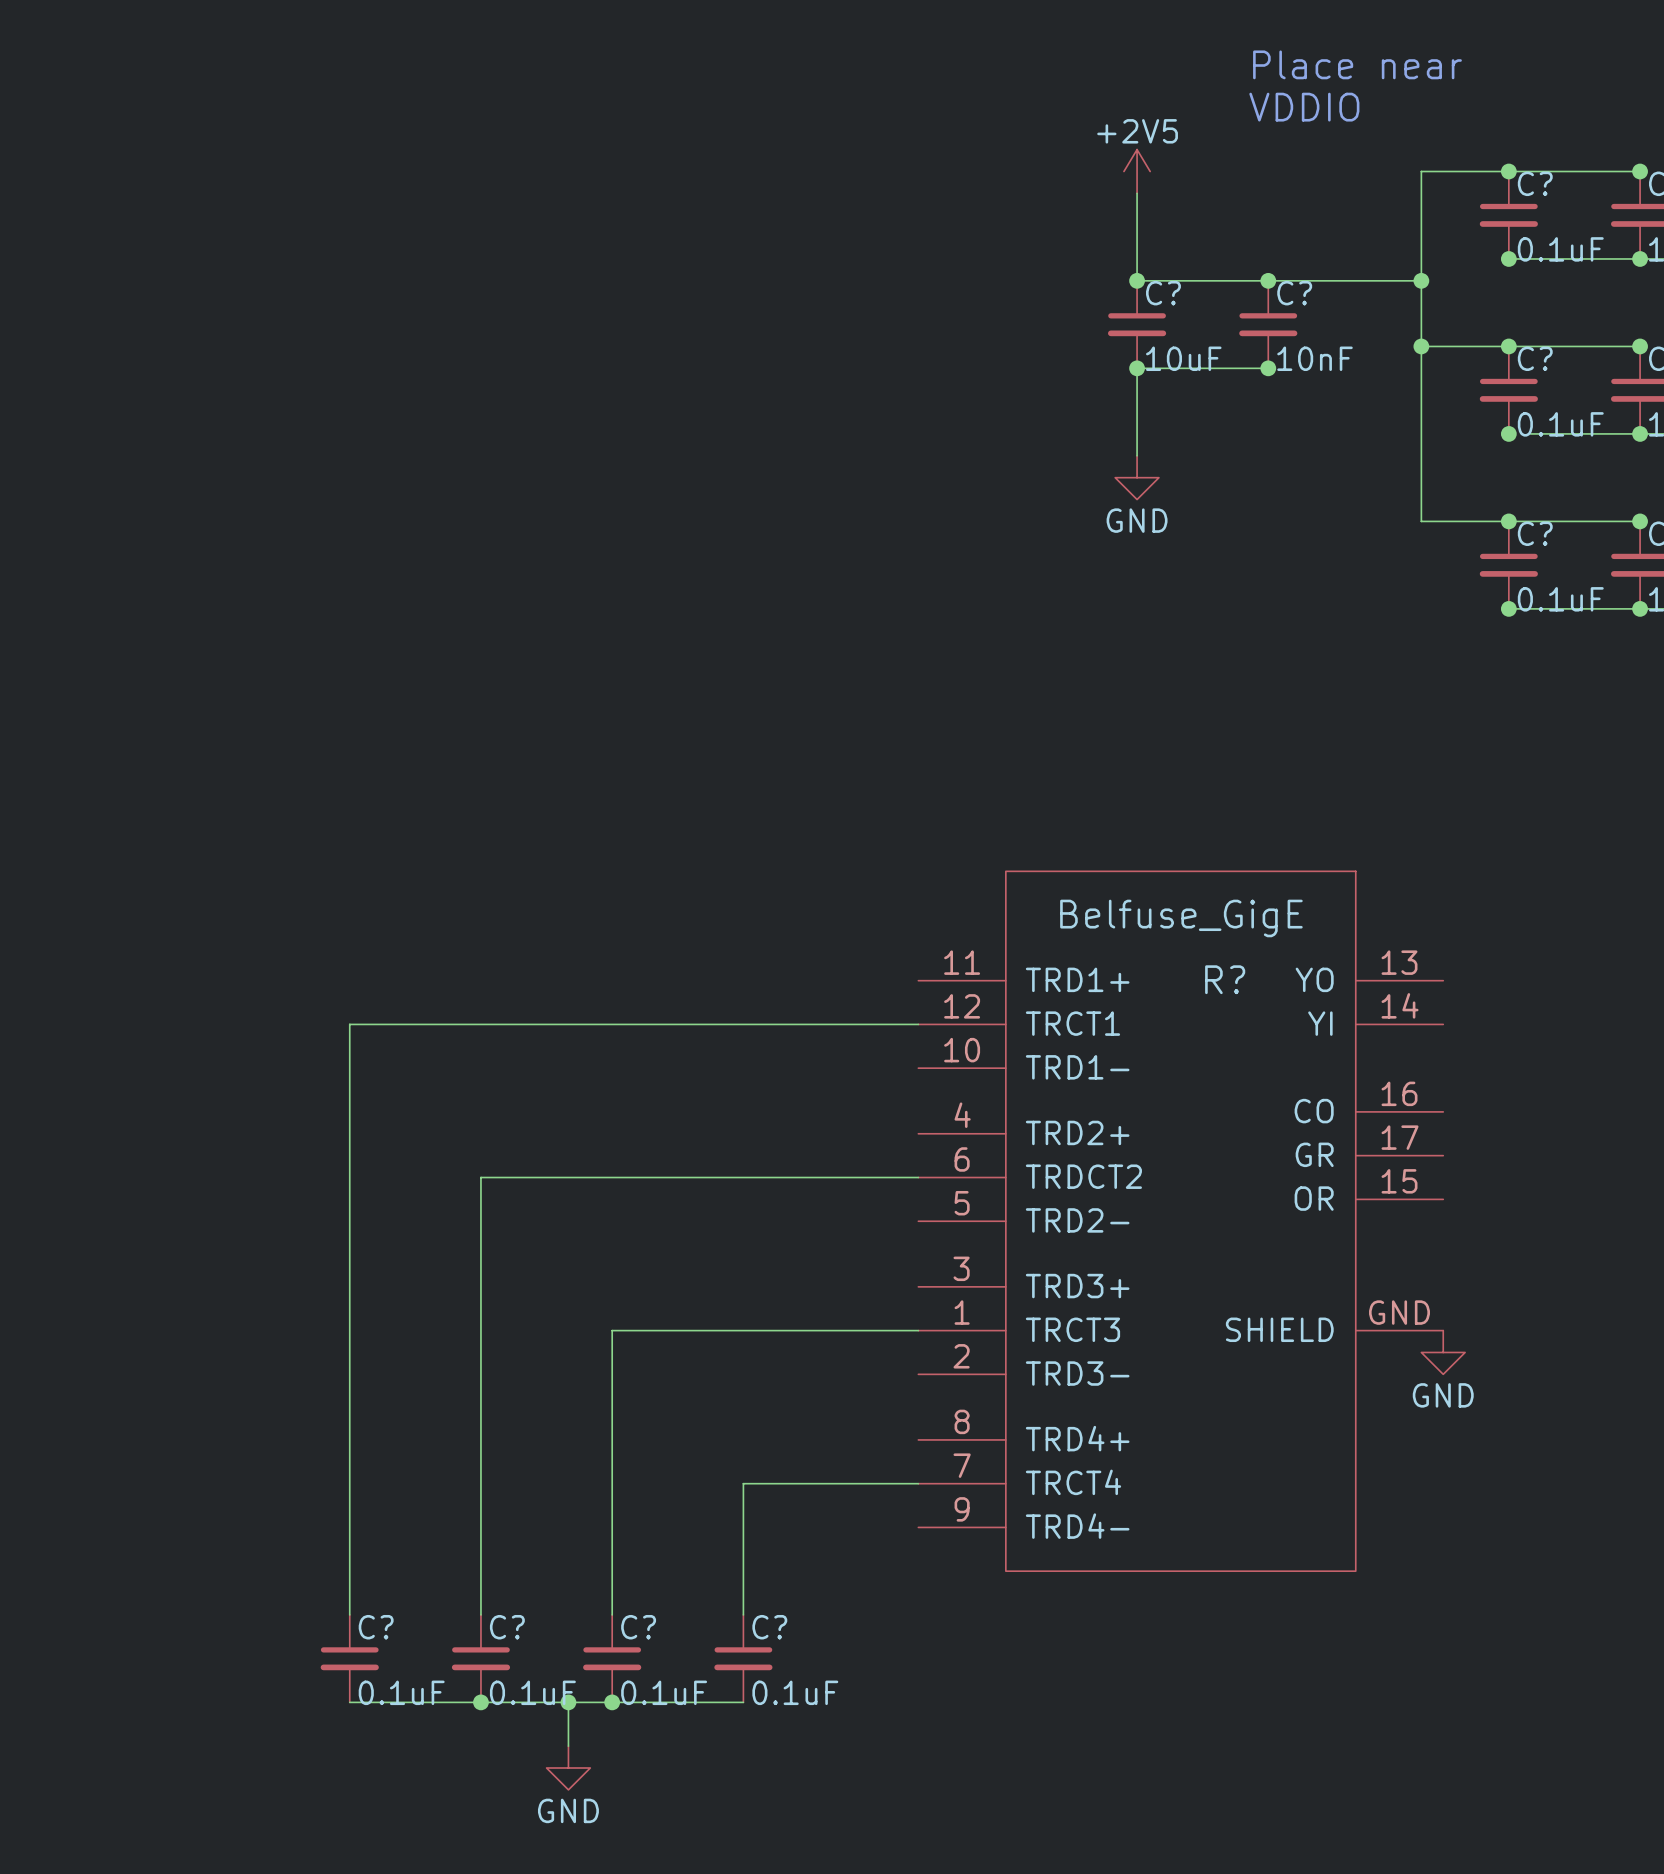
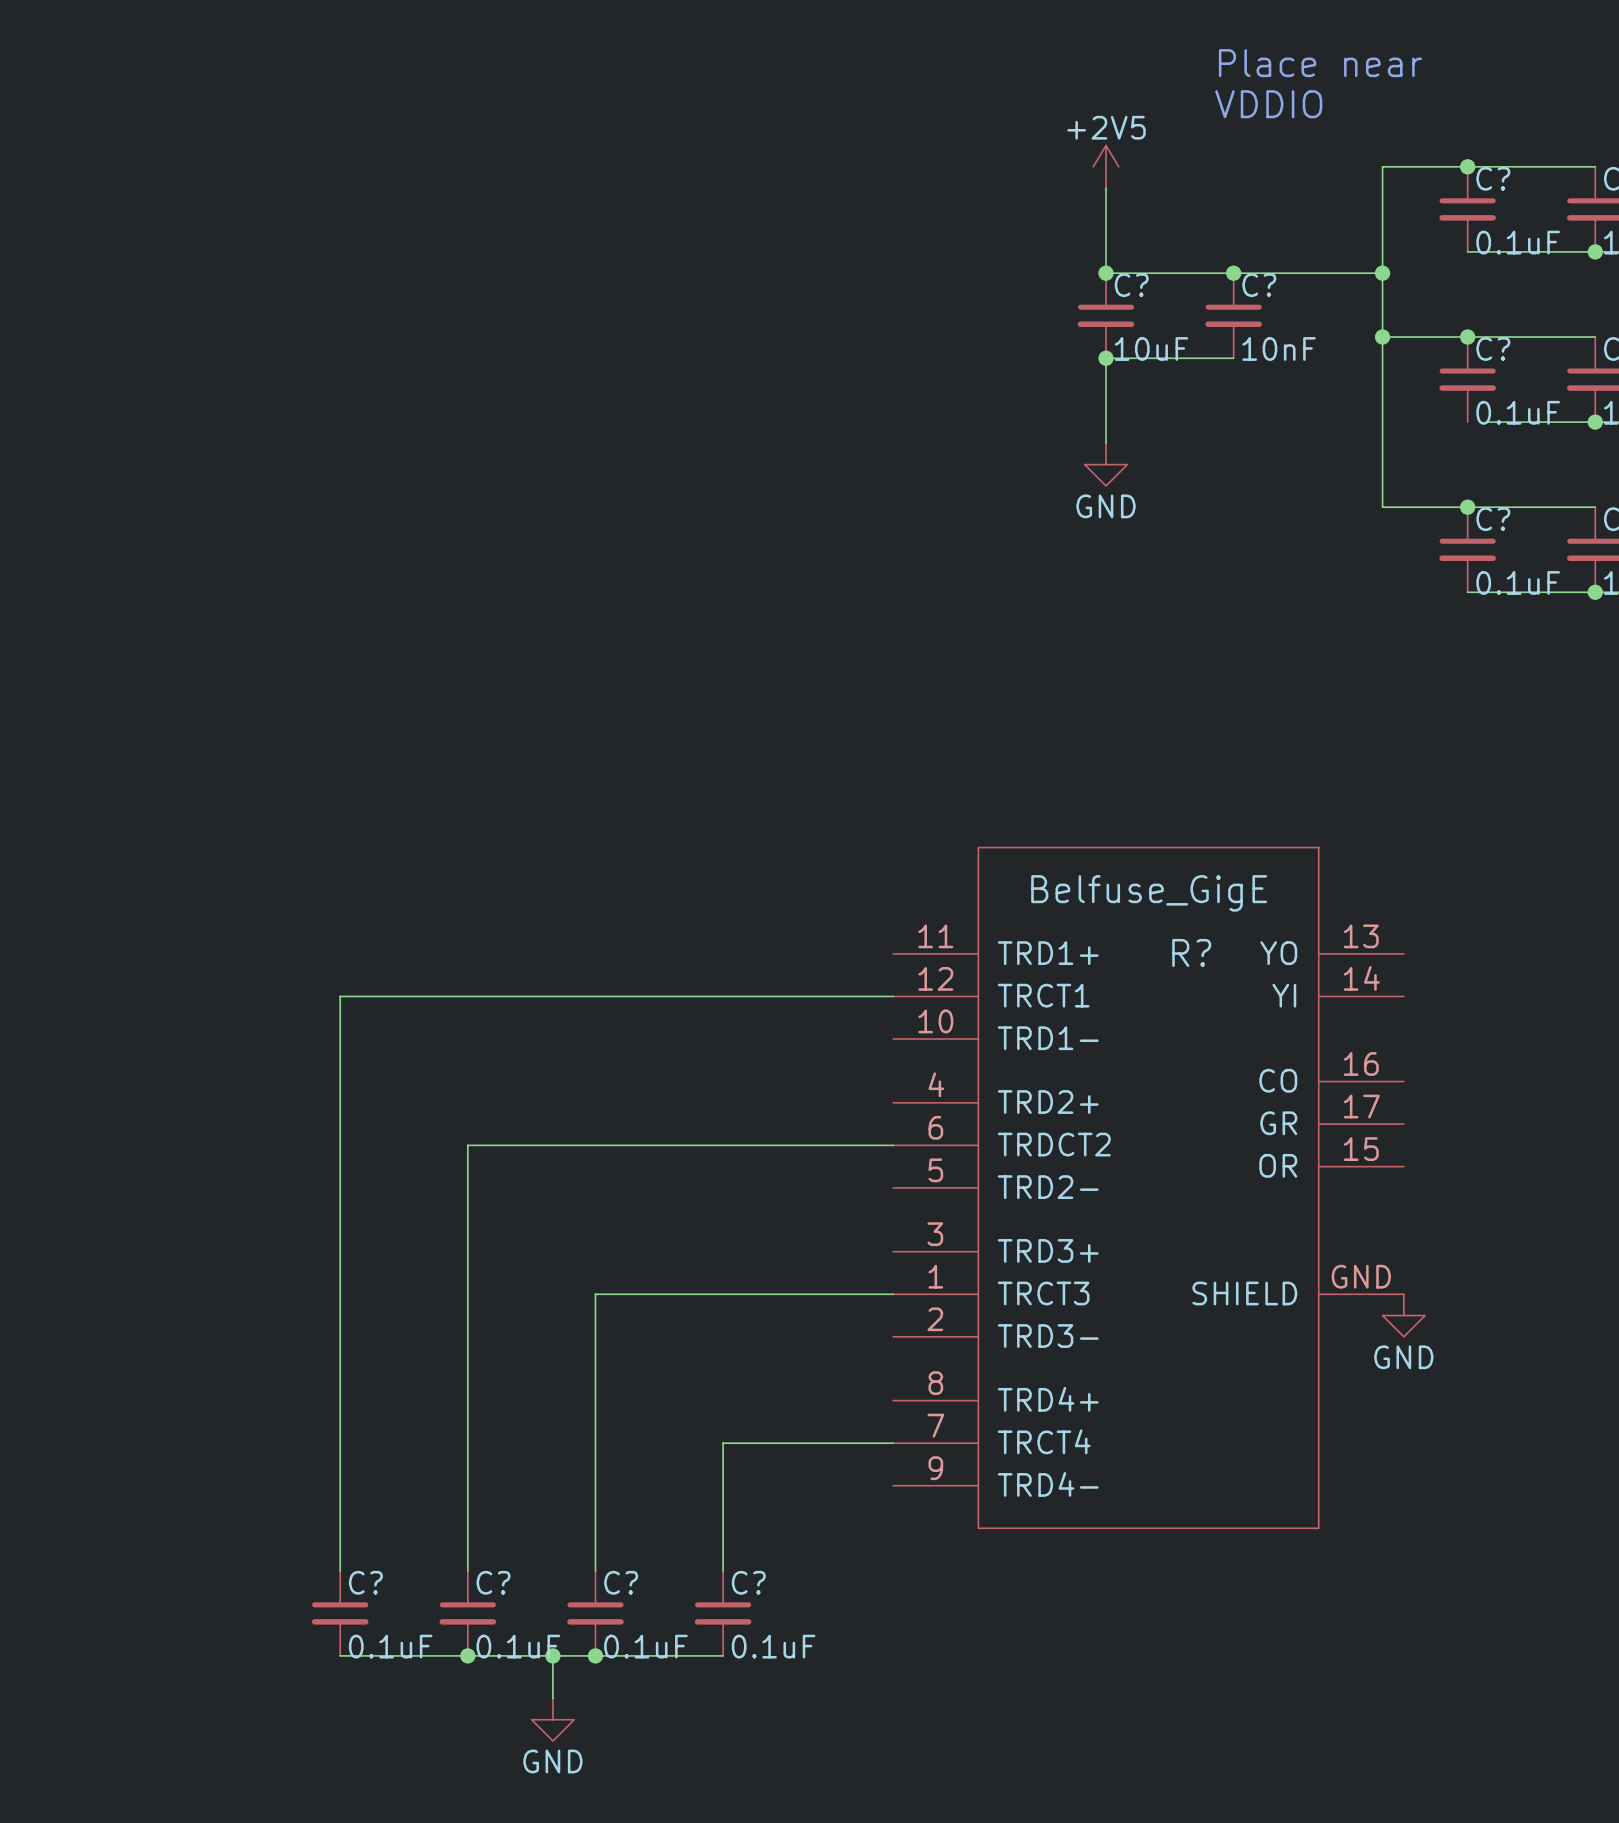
junction: (1640, 171) -> none
junction: (1508, 258) -> none
junction: (1640, 346) -> none
junction: (1268, 368) -> none
junction: (1508, 433) -> none
junction: (1640, 521) -> none
junction: (1508, 608) -> none

